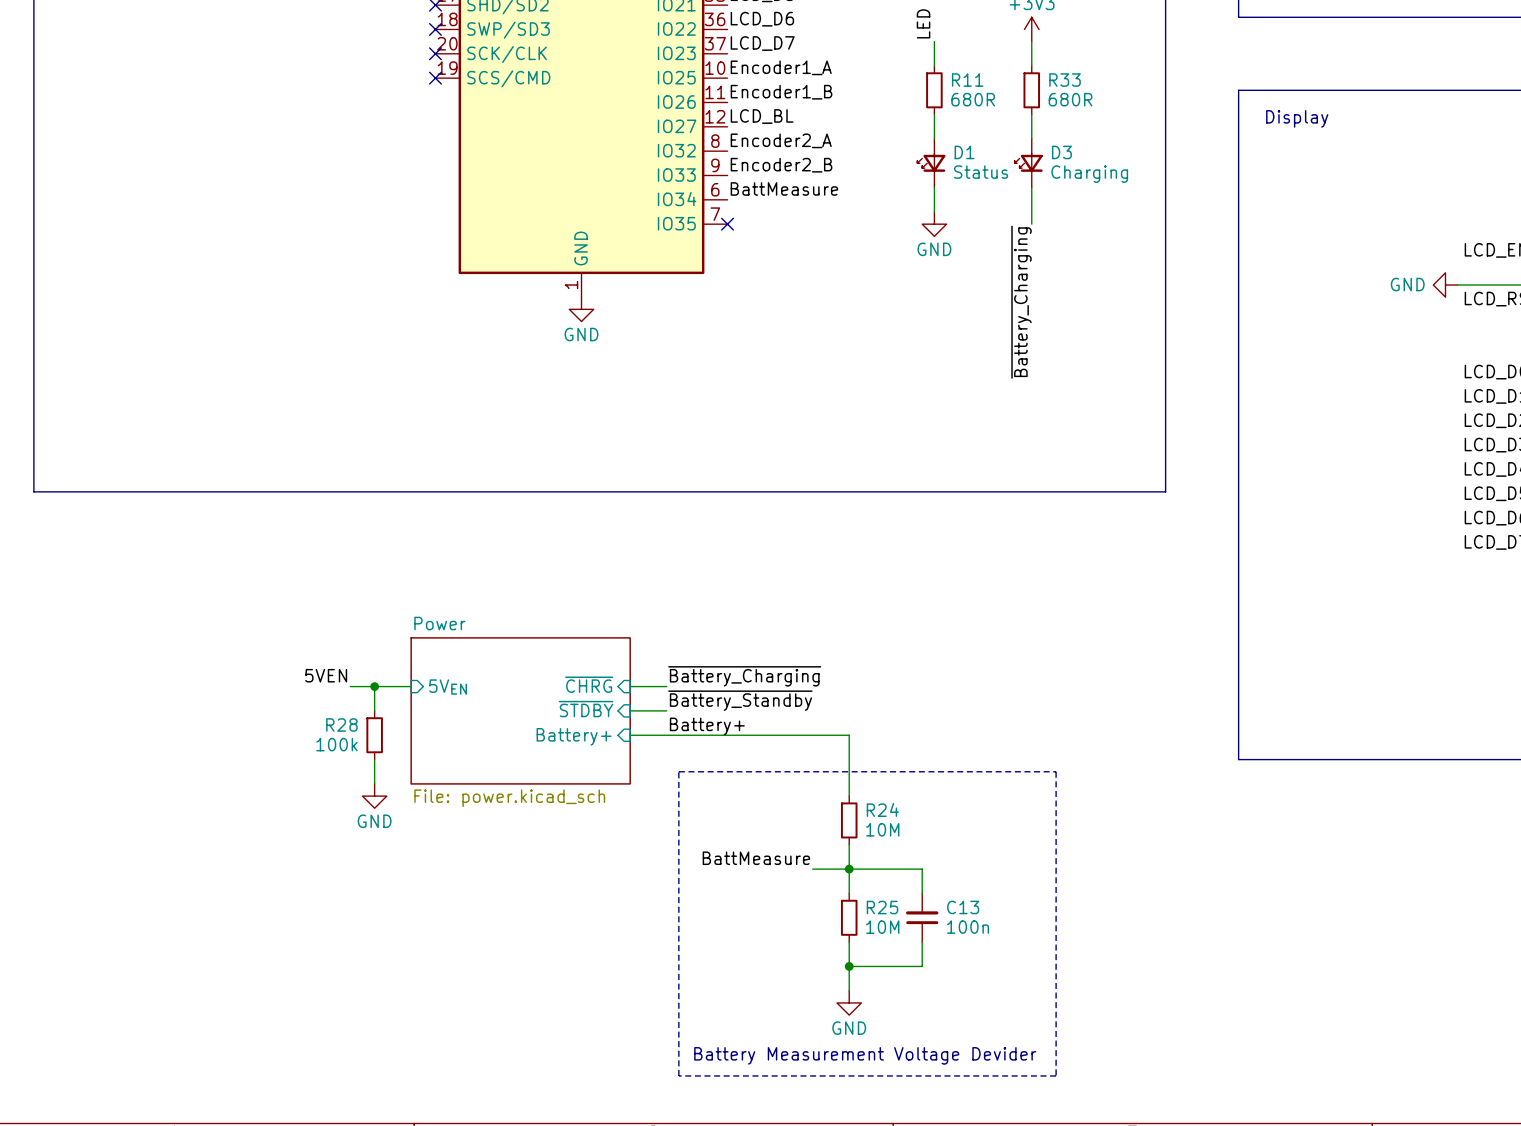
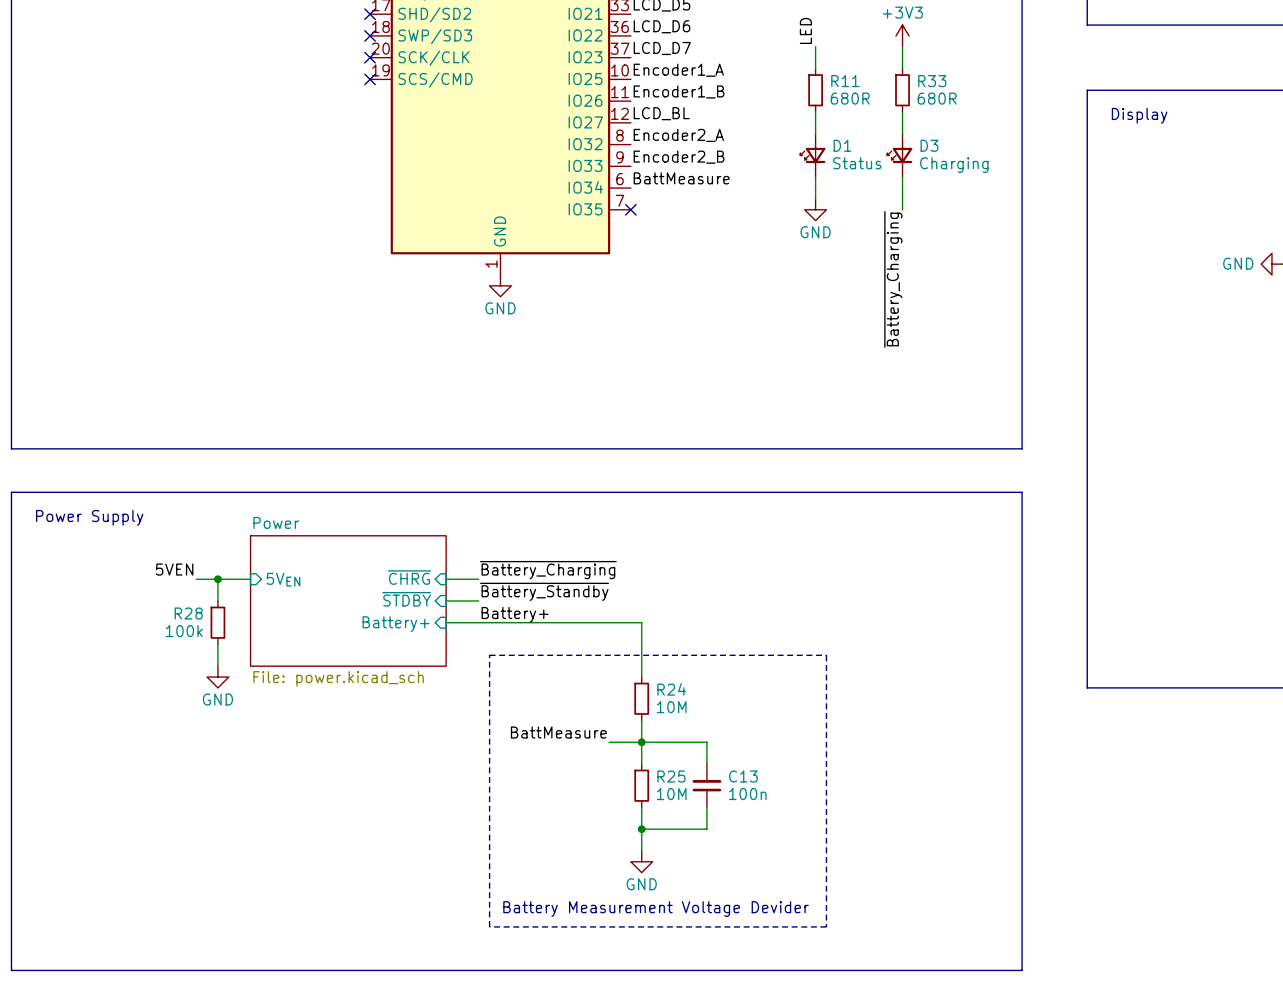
line: none -> (11, 492) (1022, 492) (1022, 970) (11, 970) (11, 492)
text: none -> Power Supply (89, 517)
junction: none -> (217, 579)
label position: 5VEN (326, 675) -> 5VEN (174, 569)
label position: ~{Battery_Charging} (744, 676) -> ~{Battery_Charging} (548, 570)
sheet pin position: ~{CHRG} (589, 684) -> ~{CHRG} (409, 577)
wire: (350, 686) (411, 686) -> (196, 579) (250, 579)
wire: (374, 686) (374, 710) -> (217, 579) (217, 600)
junction: (374, 686) -> none
wire: none -> (446, 622) (543, 622)
wire: none -> (576, 622) (641, 622) (641, 677)
sheet pin position: 5VEN (448, 687) -> 5VEN (283, 579)
label position: ~{Battery_Standby} (740, 700) -> ~{Battery_Standby} (544, 591)
sheet pin position: ~{STDBY} (585, 709) -> ~{STDBY} (406, 599)
sheet Power position: (520, 710) -> (348, 600)
wire: (630, 710) (666, 710) -> (446, 600) (478, 600)
label position: Battery+ (707, 726) -> Battery+ (515, 614)
R28 position: (374, 735) -> (217, 622)
wire: (630, 735) (849, 735) (849, 796) -> none
sheet pin position: Battery+ (574, 736) -> Battery+ (396, 624)
wire: (374, 759) (374, 783) -> (217, 644) (217, 666)
line: (678, 771) (1056, 771) (1056, 1075) (678, 1075) (678, 771) -> (489, 655) (826, 655) (826, 926) (489, 926) (489, 655)
power symbol position: GND (374, 796) -> GND (217, 677)
junction: none -> (641, 742)
R24 position: (849, 820) -> (641, 698)
wire: (849, 844) (849, 893) -> (641, 720) (641, 763)
label position: BattMeasure (756, 858) -> BattMeasure (558, 732)
wire: (812, 869) (922, 869) (922, 893) -> (609, 742) (706, 742) (706, 763)
junction: (849, 869) -> none
junction: none -> (641, 829)
R25 position: (849, 917) -> (641, 785)
C13 position: (922, 917) -> (706, 785)
wire: (849, 942) (849, 990) -> (641, 807) (641, 850)
wire: (922, 942) (922, 966) (849, 966) -> (706, 807) (706, 829) (641, 829)
junction: (849, 966) -> none
power symbol position: GND (849, 1002) -> GND (641, 861)
text position: Battery Measurement Voltage Devider (865, 1055) -> Battery Measurement Voltage Devider (656, 909)

